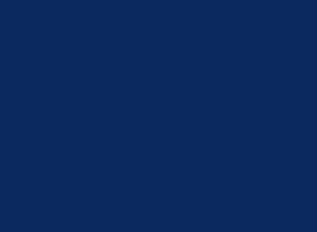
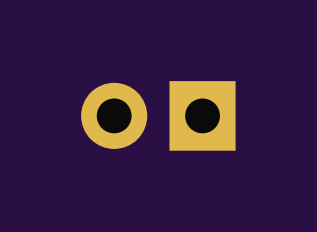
part: none -> (158, 115)

